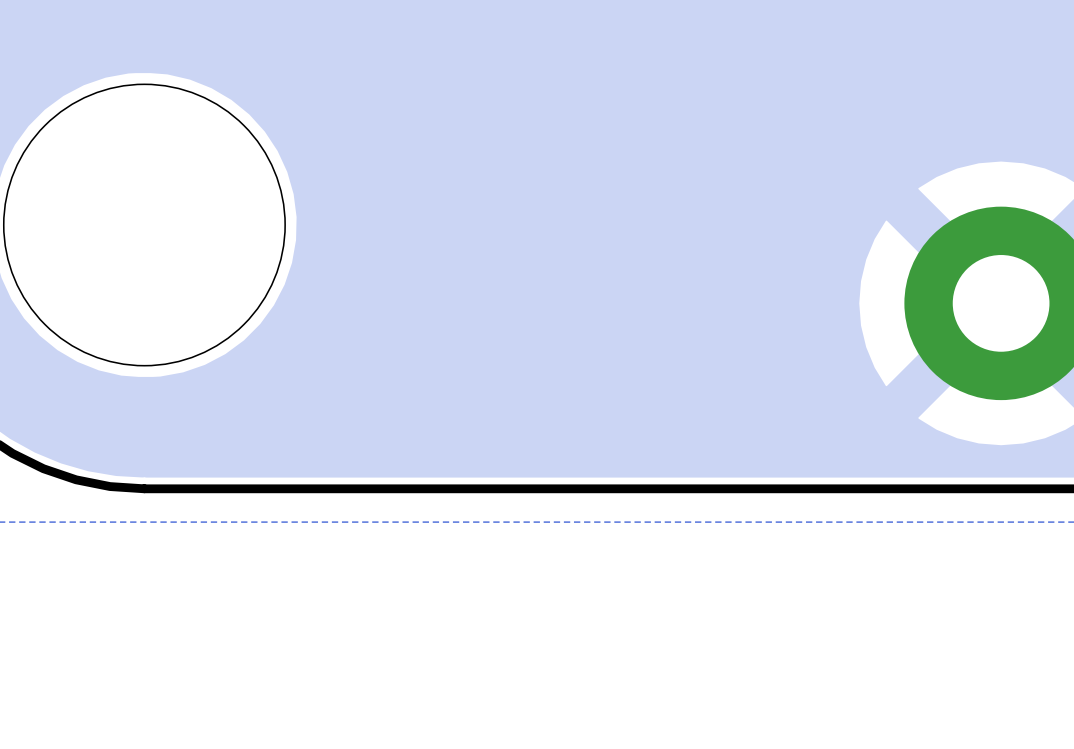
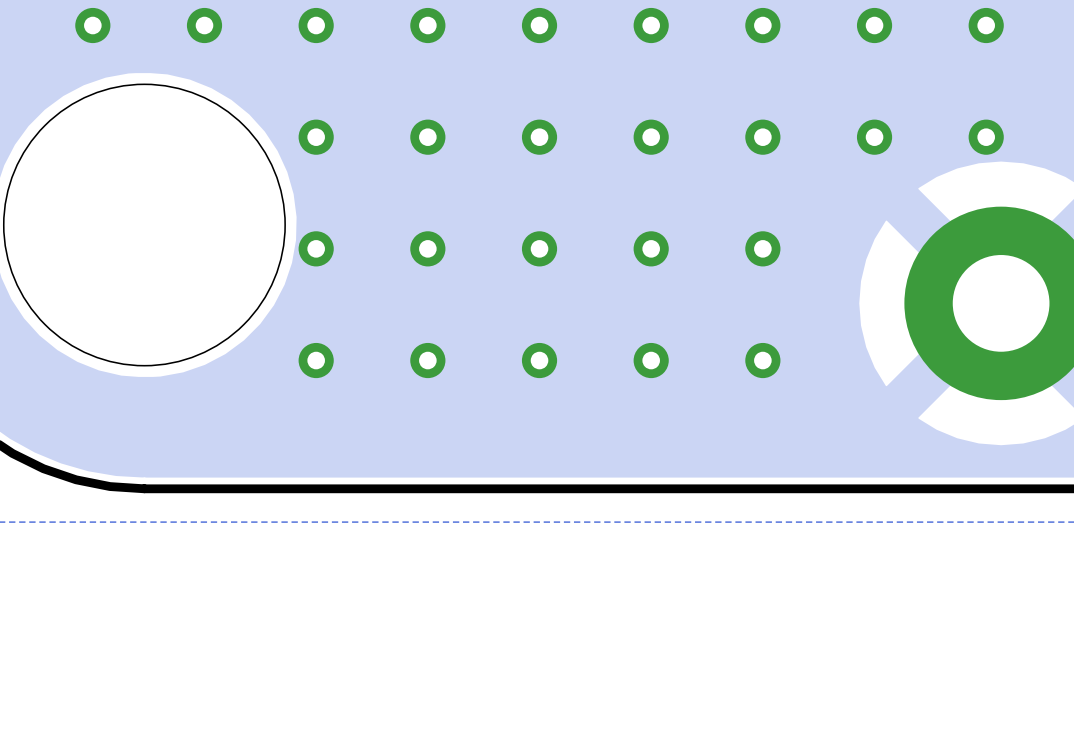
via: none -> (92, 25)
via: none -> (204, 25)
via: none -> (316, 25)
via: none -> (427, 25)
via: none -> (539, 25)
via: none -> (651, 25)
via: none -> (762, 25)
via: none -> (874, 25)
via: none -> (986, 25)
via: none -> (316, 137)
via: none -> (427, 137)
via: none -> (539, 137)
via: none -> (651, 137)
via: none -> (762, 137)
via: none -> (874, 137)
via: none -> (986, 137)
via: none -> (316, 248)
via: none -> (427, 248)
via: none -> (539, 248)
via: none -> (651, 248)
via: none -> (762, 248)
via: none -> (316, 360)
via: none -> (427, 360)
via: none -> (539, 360)
via: none -> (651, 360)
via: none -> (762, 360)

